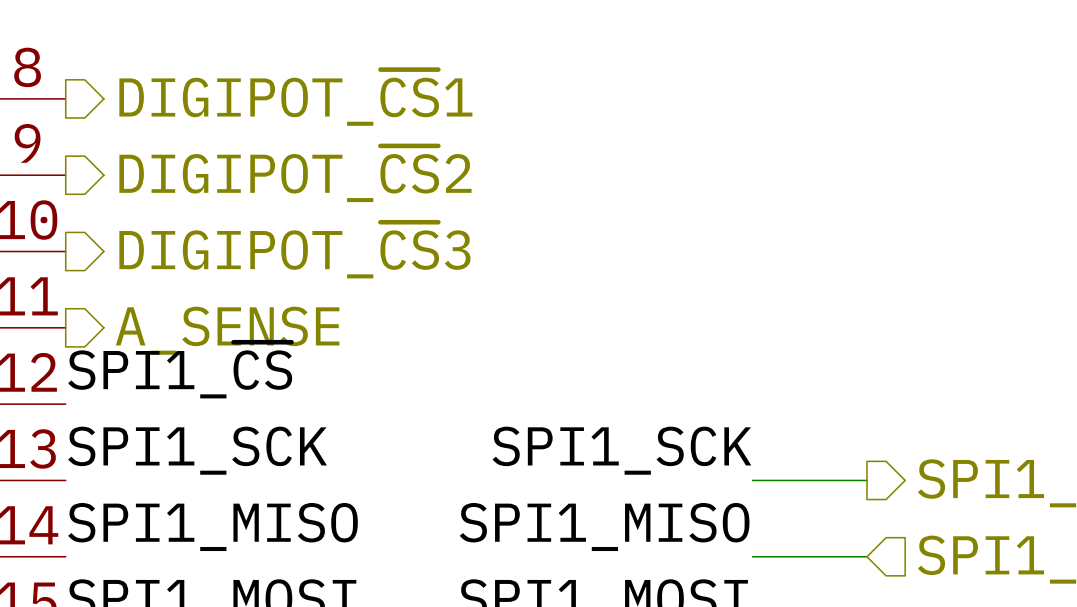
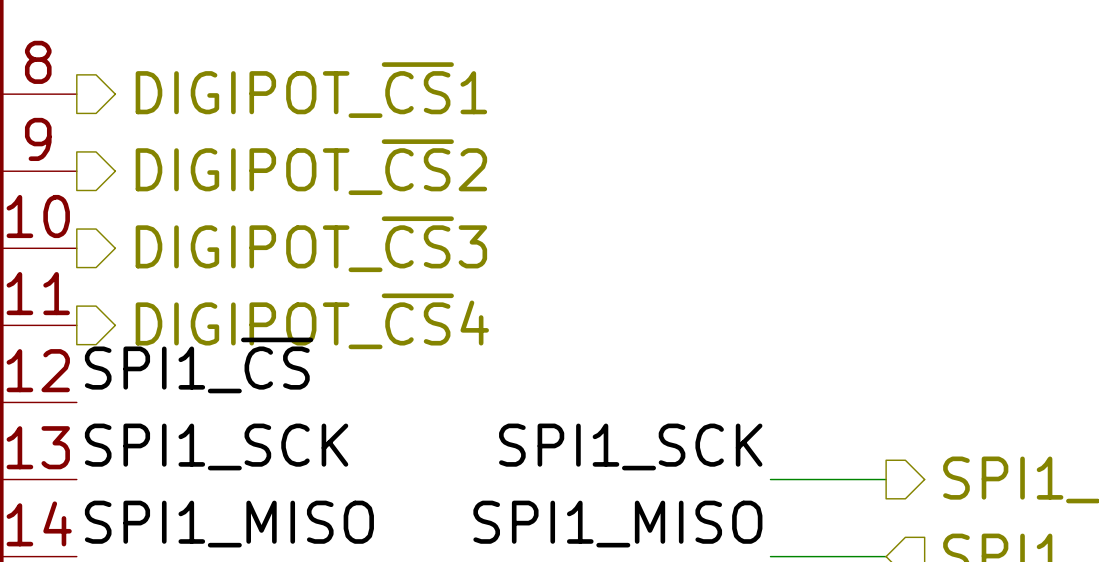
hierarchical label: A_SENSE (227, 330) -> DIGIPOT_~{CS}4 (312, 321)

